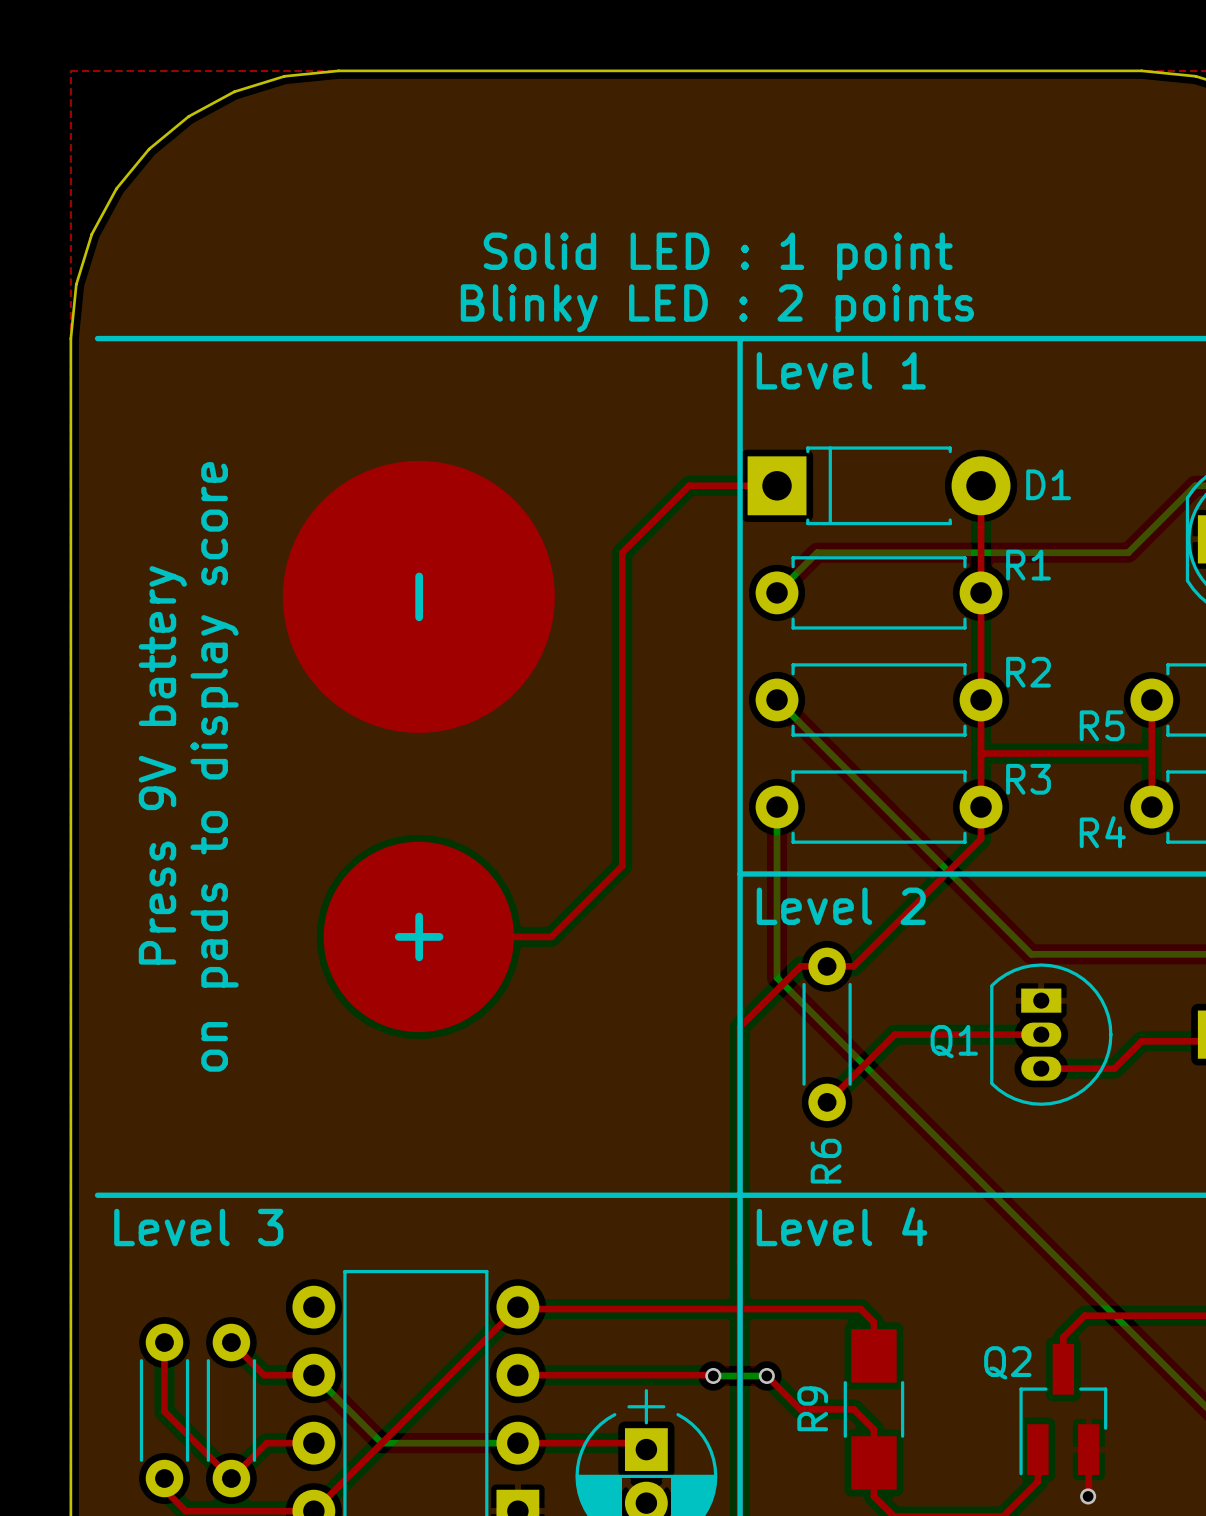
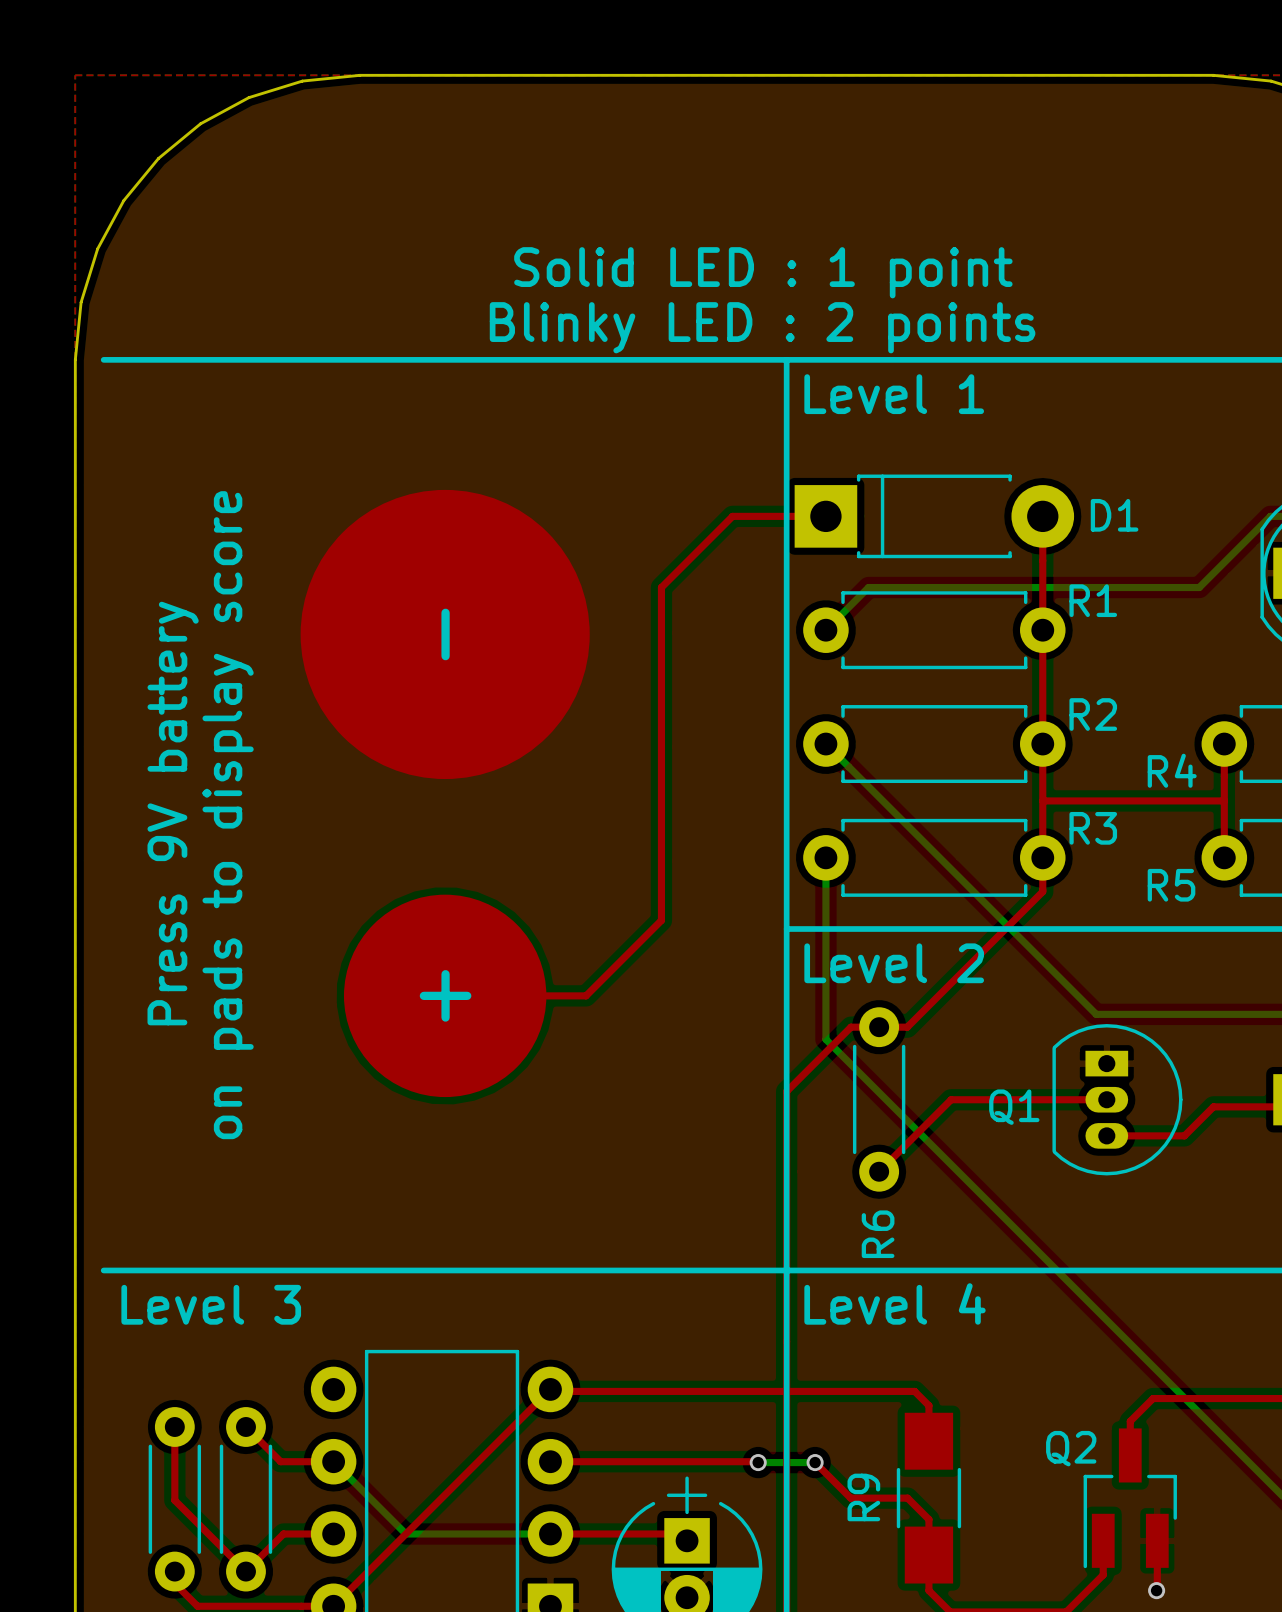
R5 name: R5 (1102, 725) -> R4 (1172, 770)
R4 name: R4 (1102, 832) -> R5 (1171, 885)

